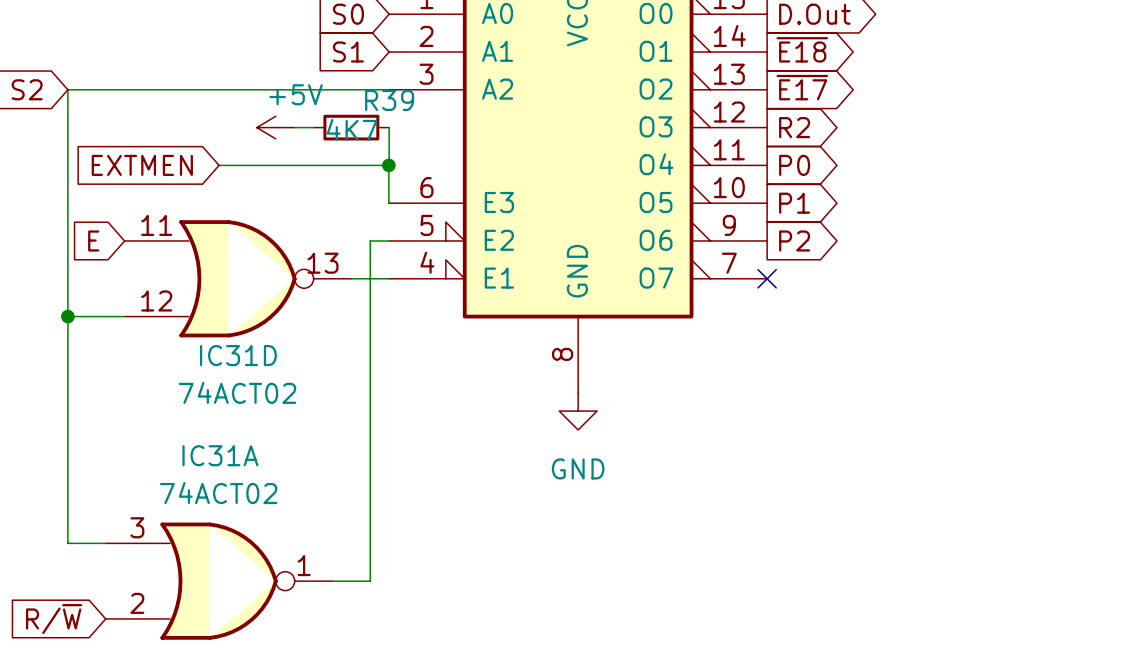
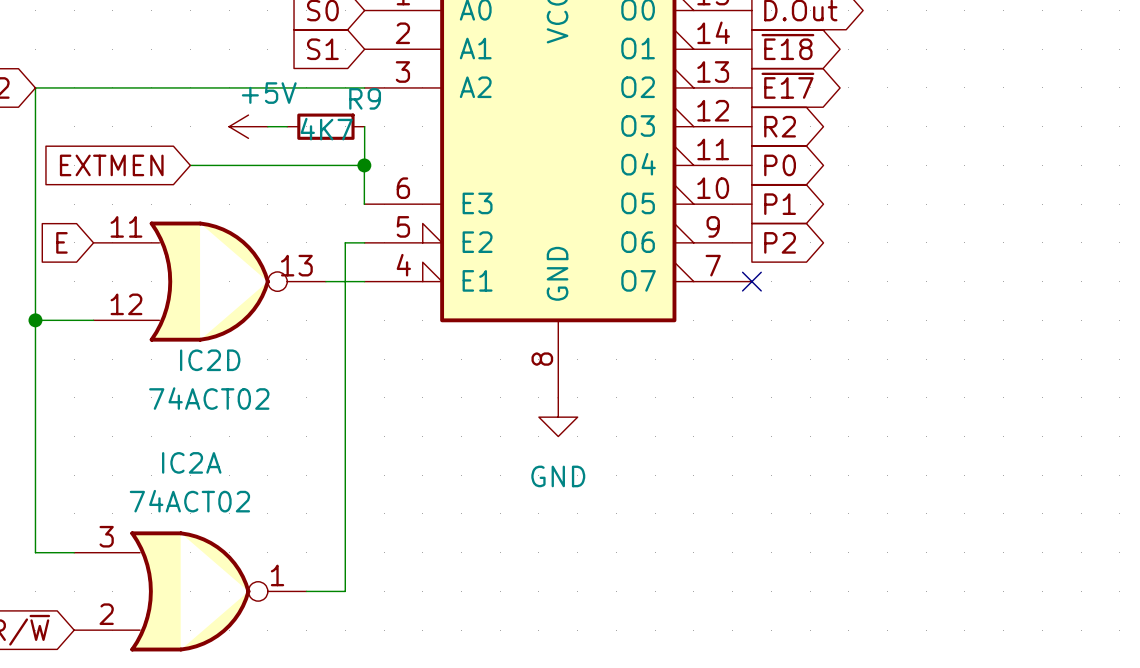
R39 name: R39 (389, 100) -> R9 (365, 98)
IC31D name: IC31D (238, 355) -> IC2D (210, 360)
IC31A name: IC31A (220, 455) -> IC2A (191, 462)

